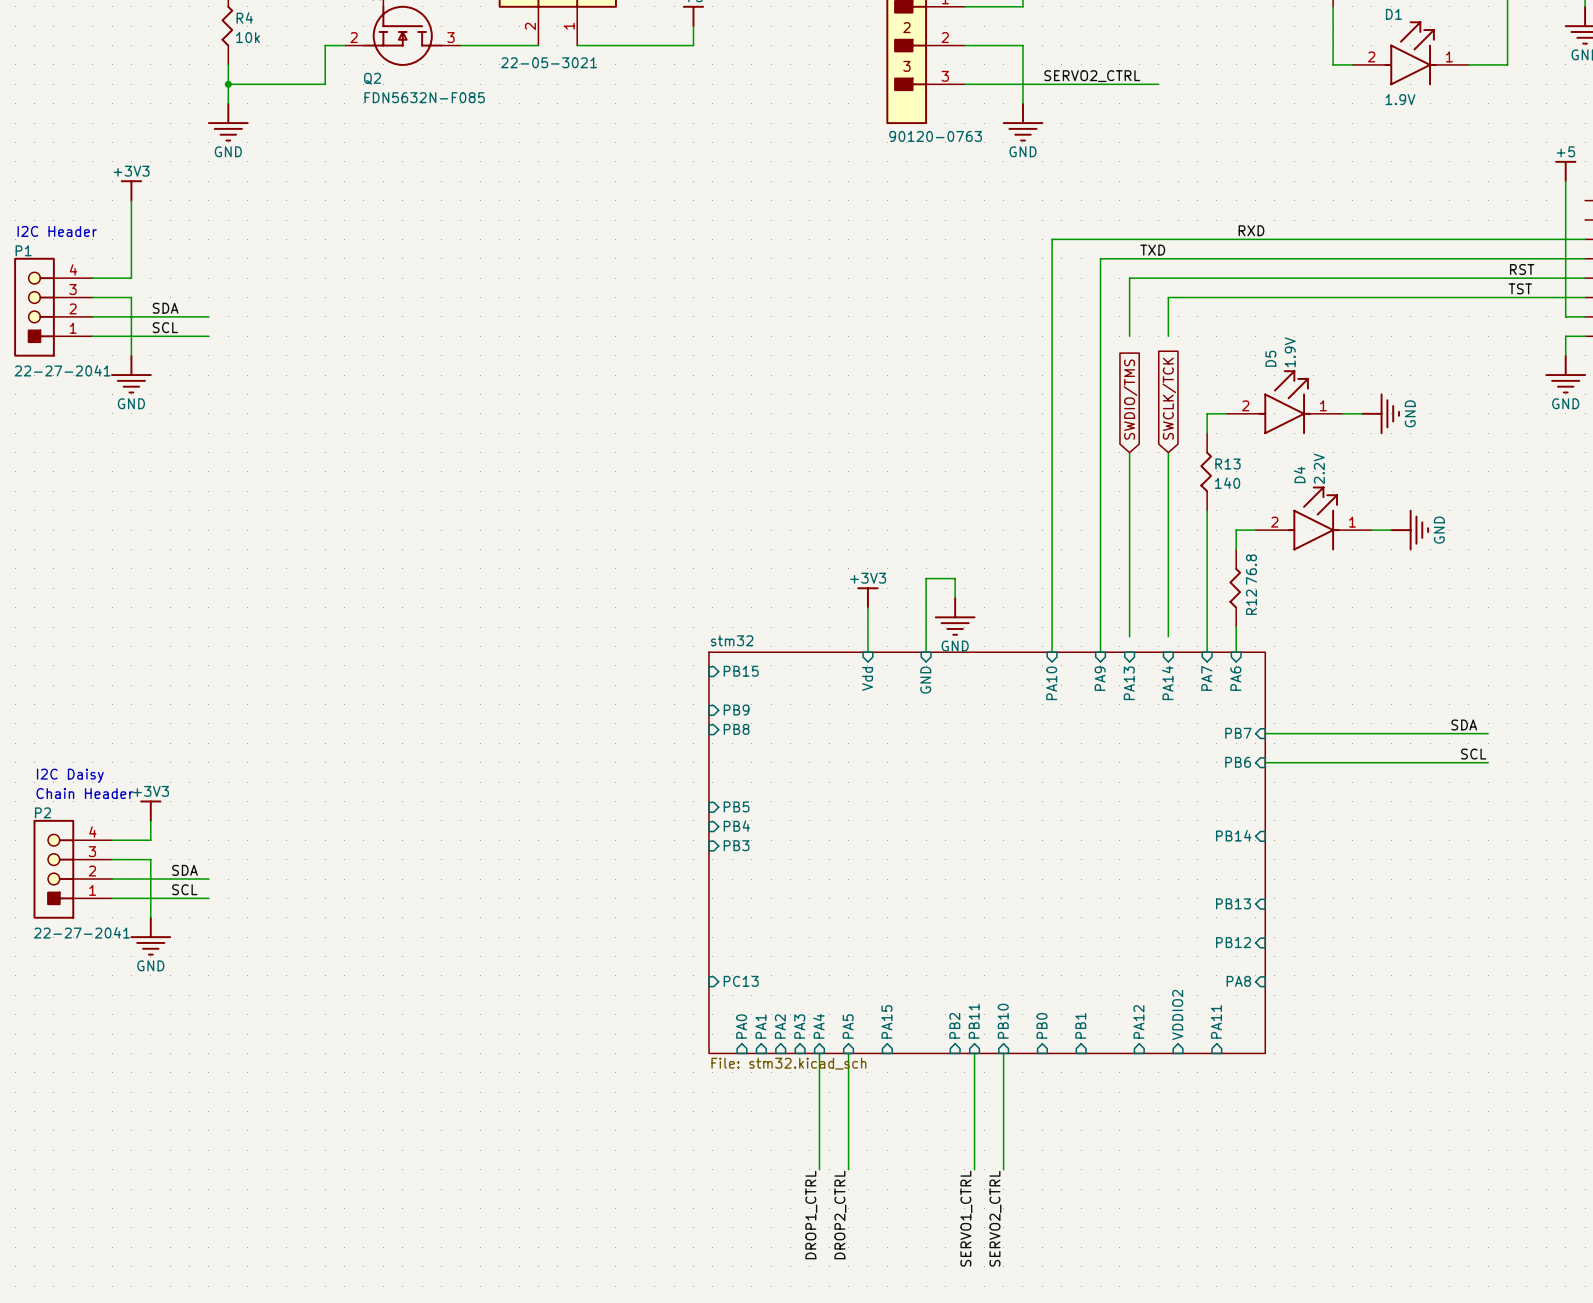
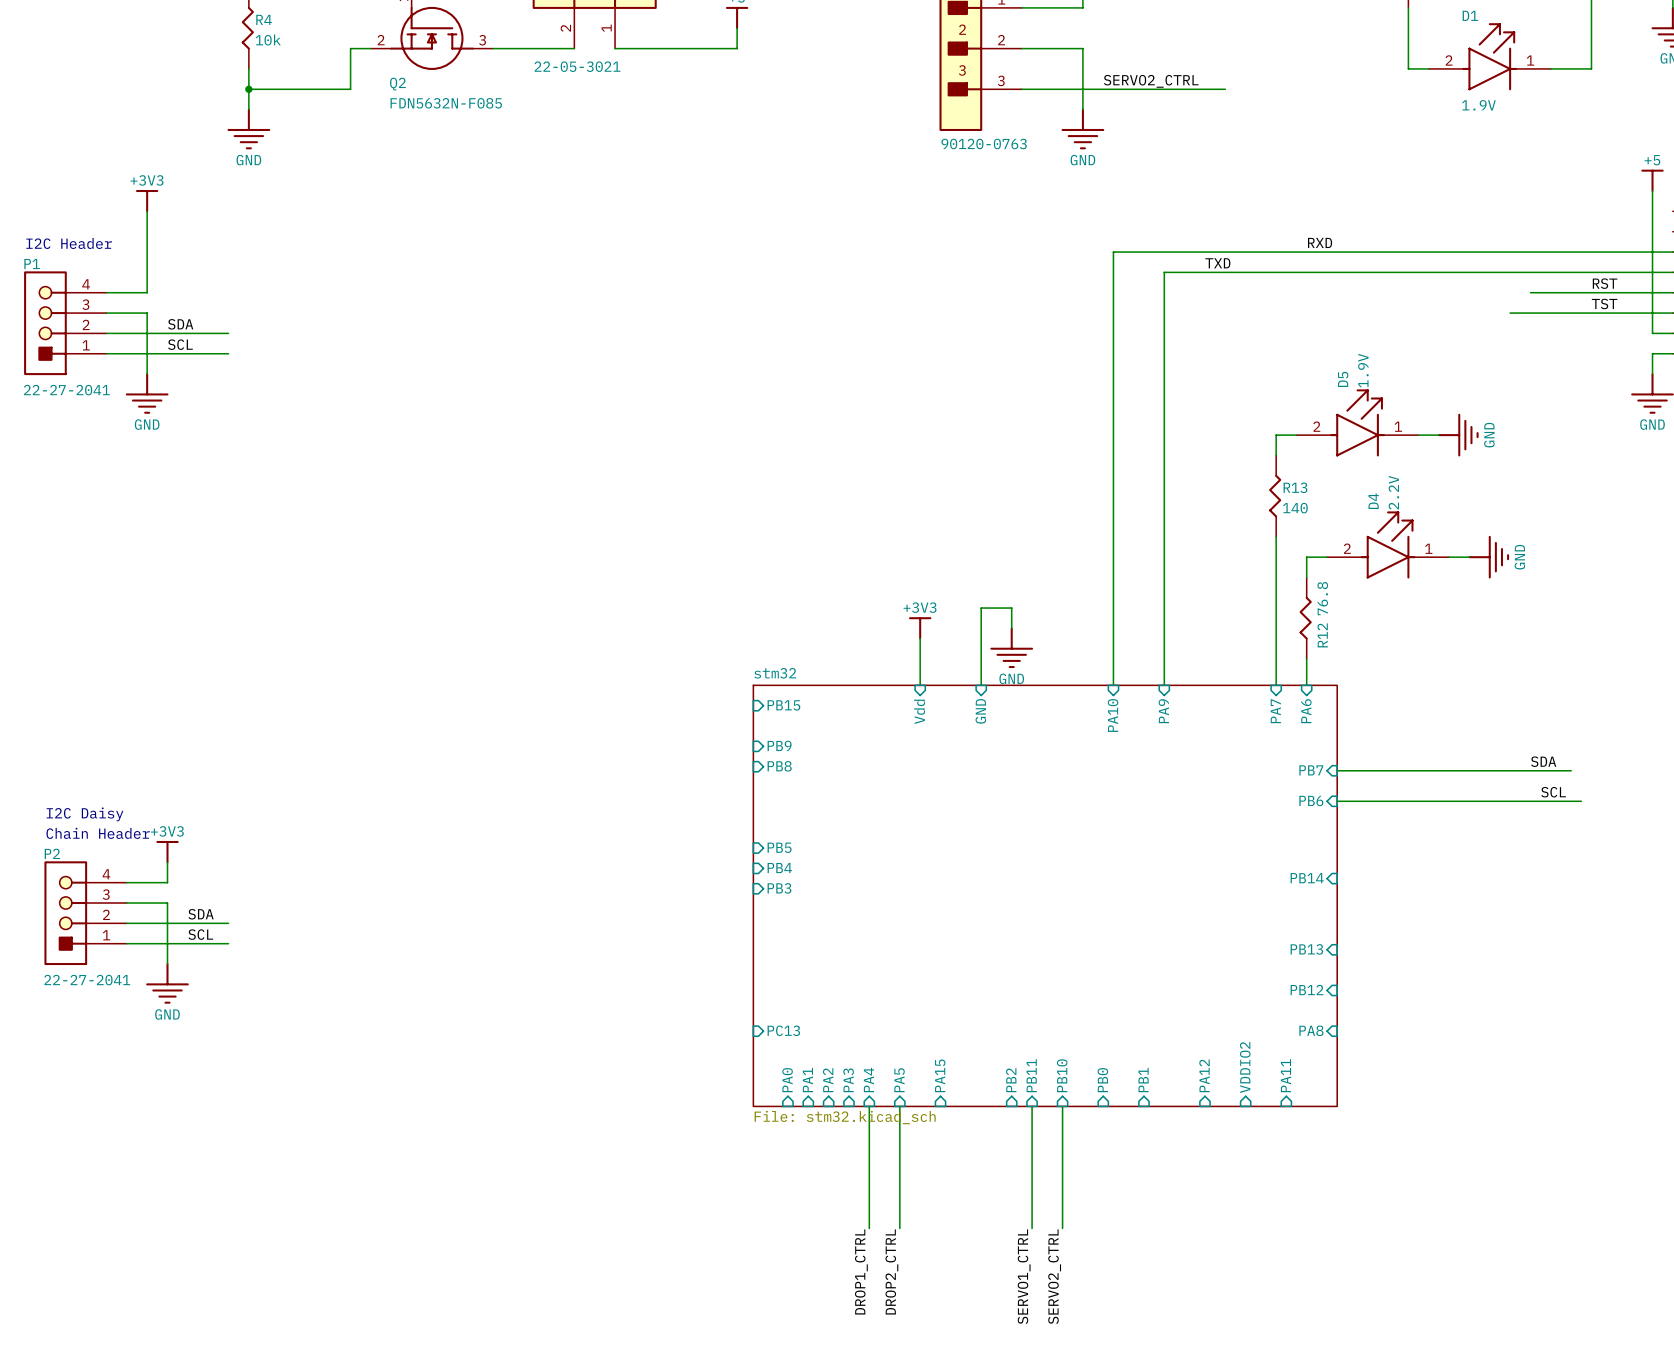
wire: (1449, 278) (1129, 278) (1129, 336) -> none
wire: (1430, 297) (1168, 297) (1168, 336) -> none
global label: SWCLK/TCK (1169, 398) -> none
global label: SWDIO/TMS (1130, 399) -> none
wire: (1129, 452) (1129, 636) -> none
wire: (1168, 452) (1168, 636) -> none
sheet pin: PA13 (1129, 683) -> none
sheet pin: PA14 (1167, 683) -> none
wire: none -> (1571, 801) (1581, 801)

